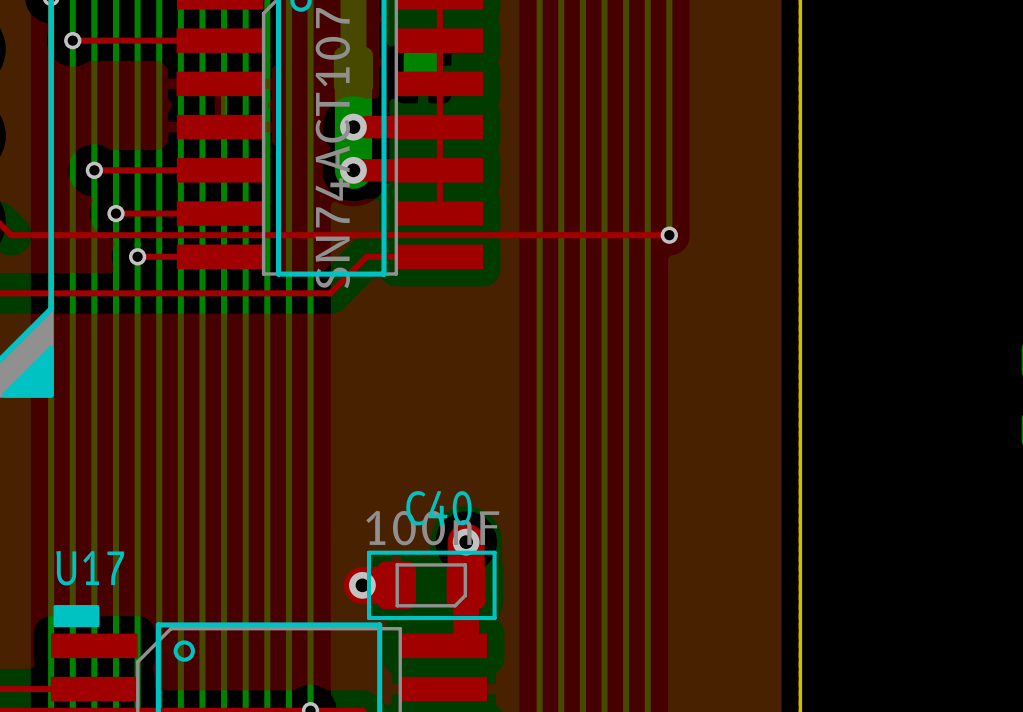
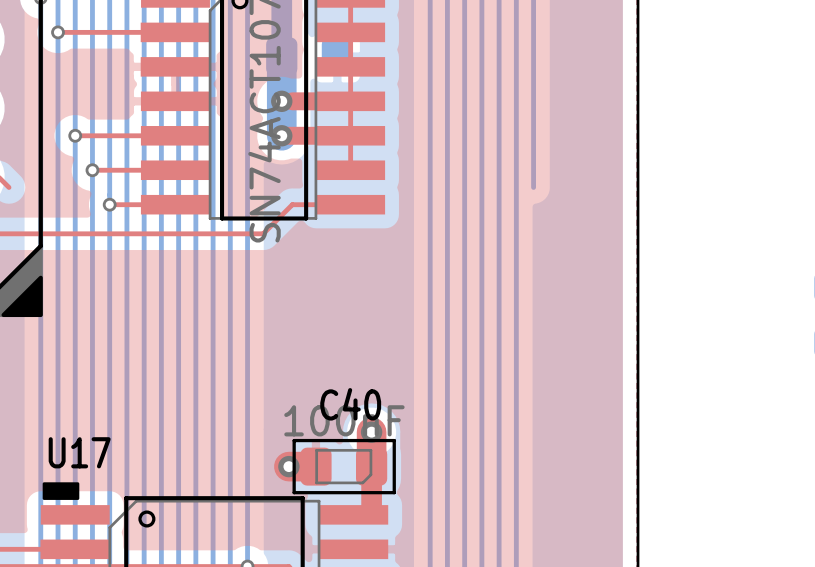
top track: (11, 235) (669, 235) -> none
via: (669, 235) -> none

